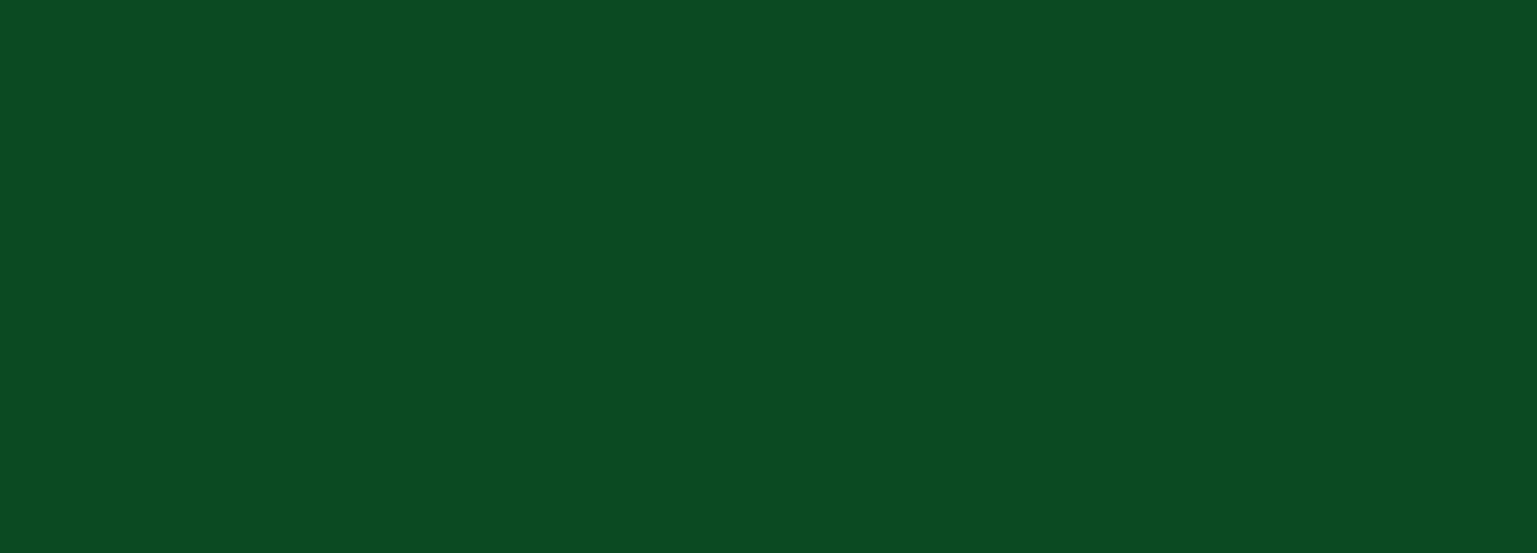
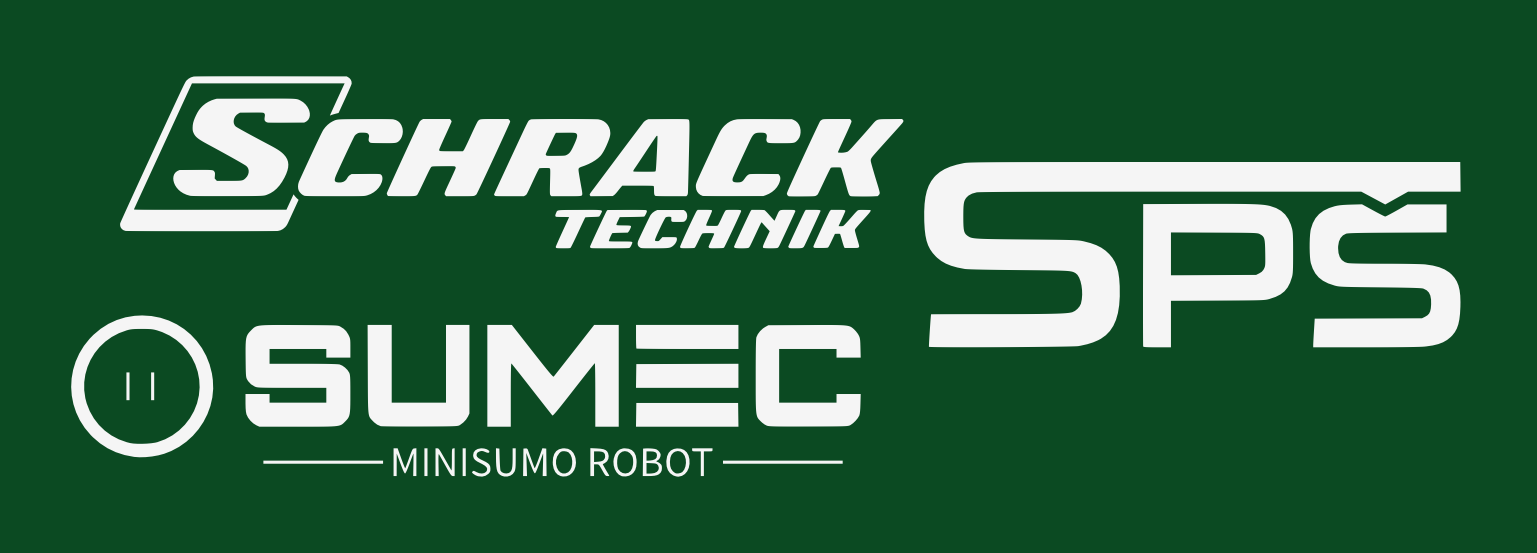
drawing: none -> [120, 76, 1461, 348]
drawing: none -> [71, 315, 861, 477]

